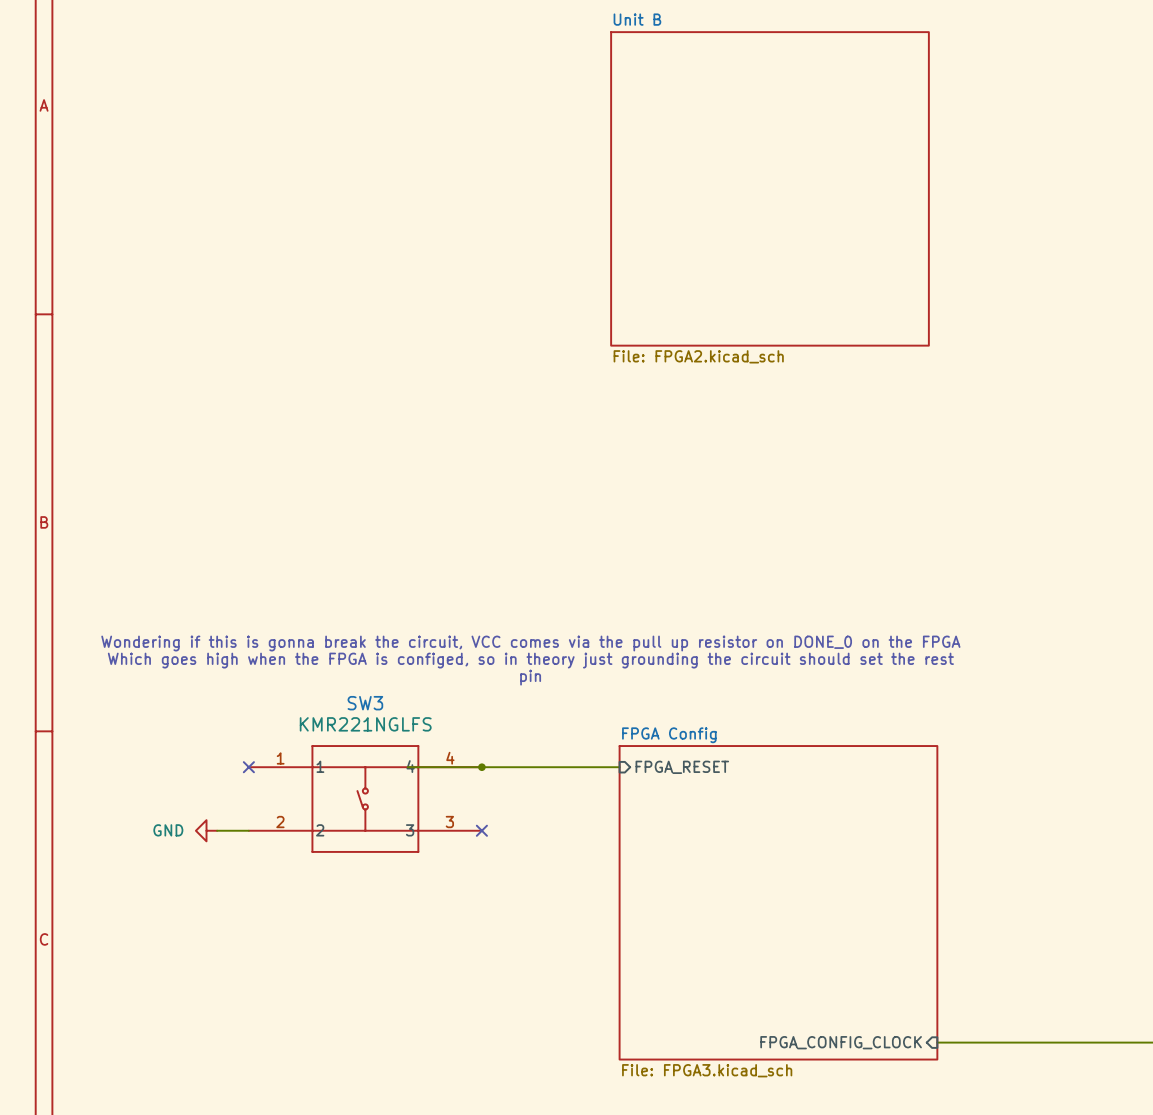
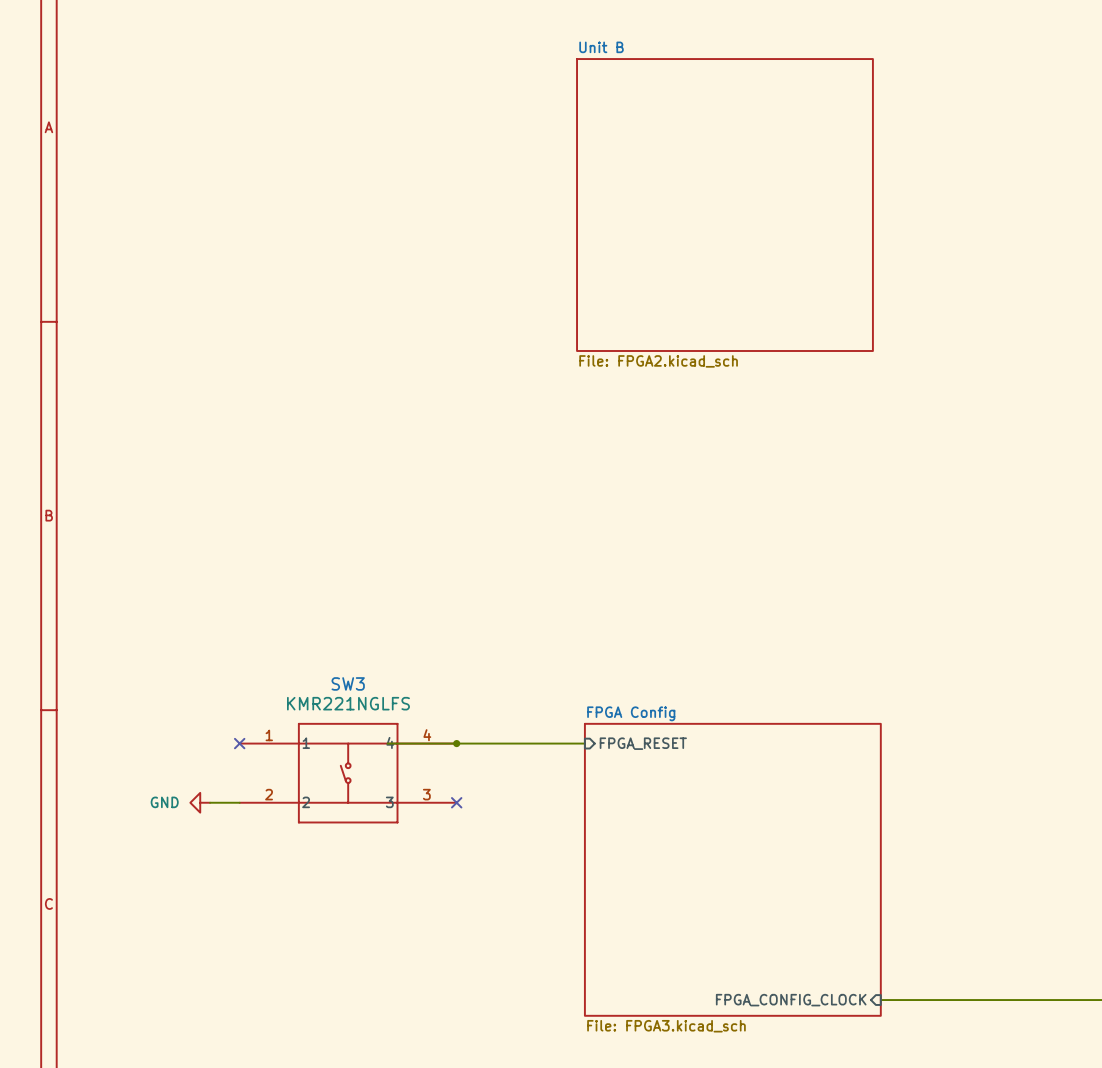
text: Wondering if this is gonna break the circuit, VCC comes via the pull up resistor on DONE_0 on the FPGA (530, 643) -> none
text: Which goes high when the FPGA is configed, so in theory just grounding the circuit should set the rest (530, 660) -> none
text: pin (530, 677) -> none

